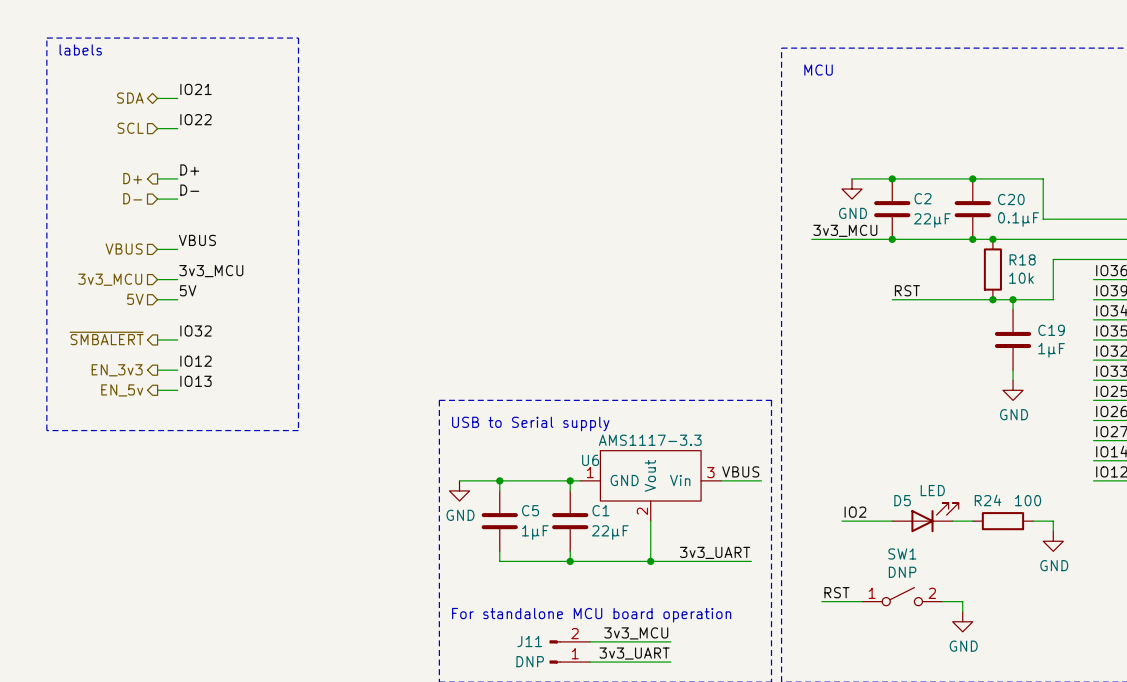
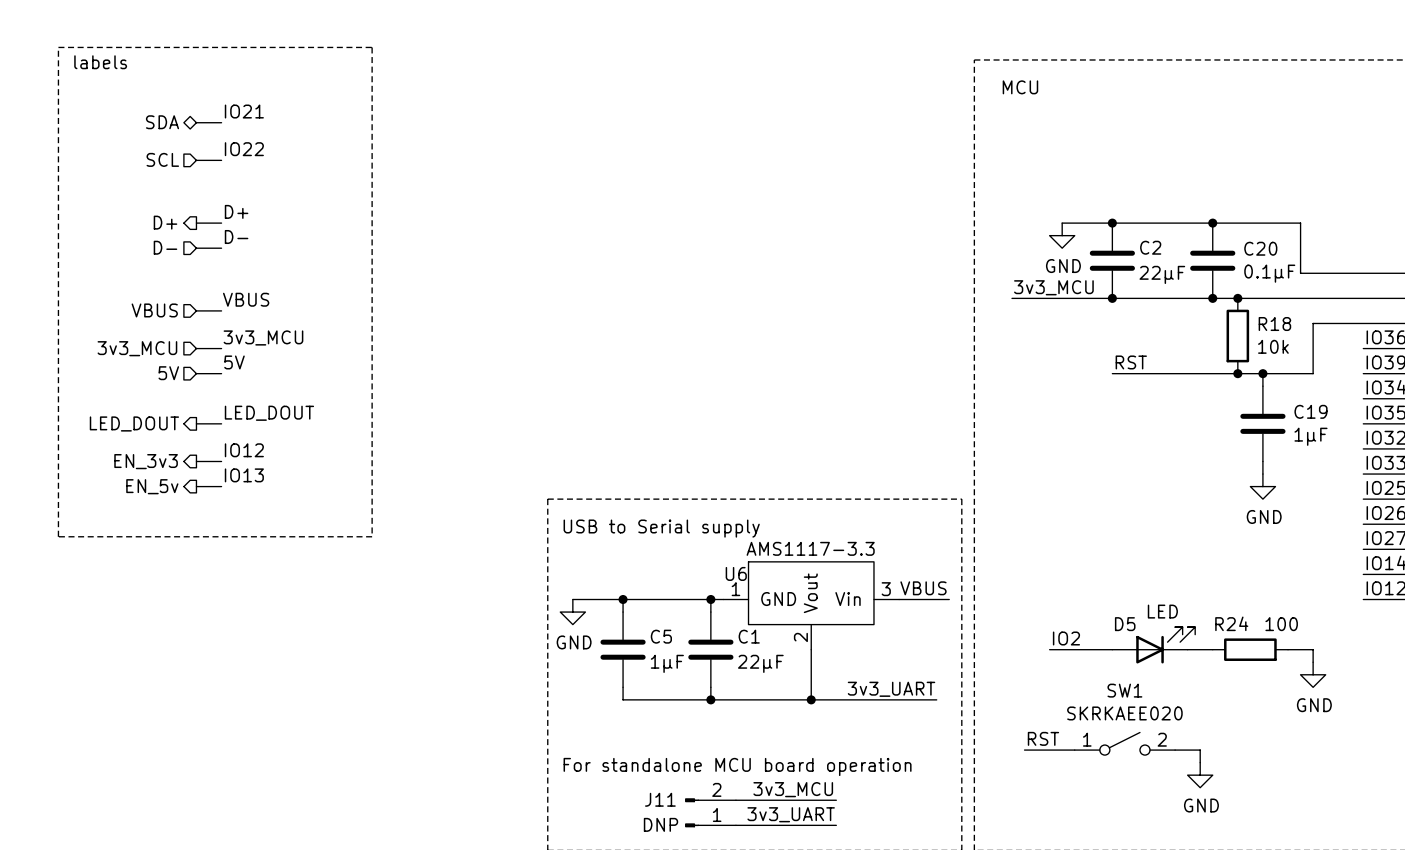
label: IO32 (196, 331) -> LED_DOUT (269, 413)
hierarchical label: ~{SMBALERT} (106, 338) -> LED_DOUT (134, 423)
SW1 value: DNP (902, 572) -> SKRKAEE020 (1124, 713)

